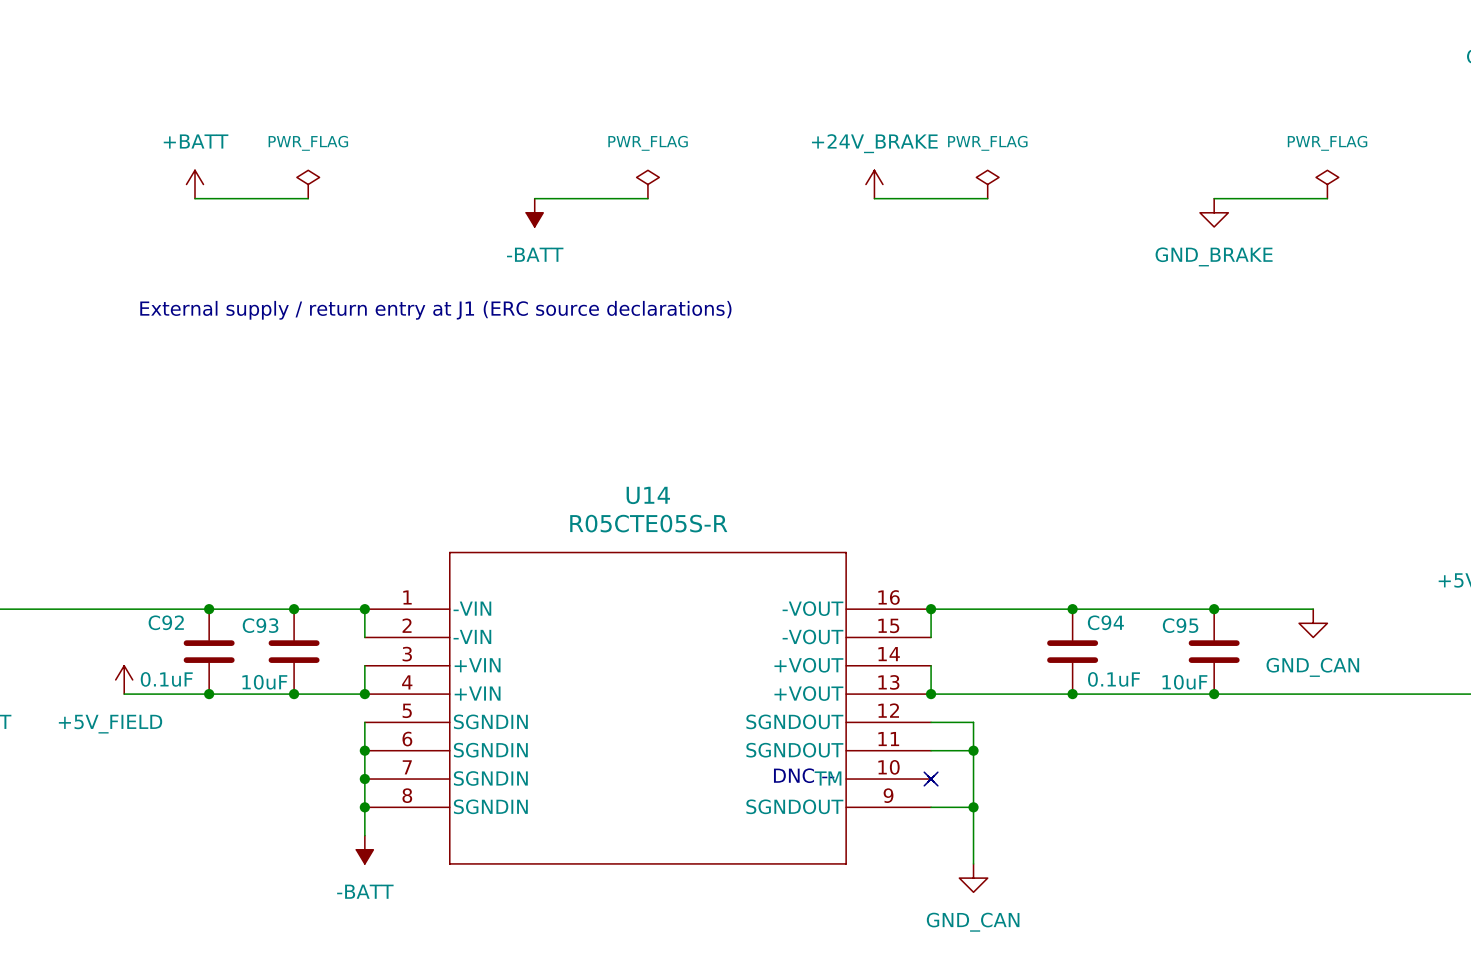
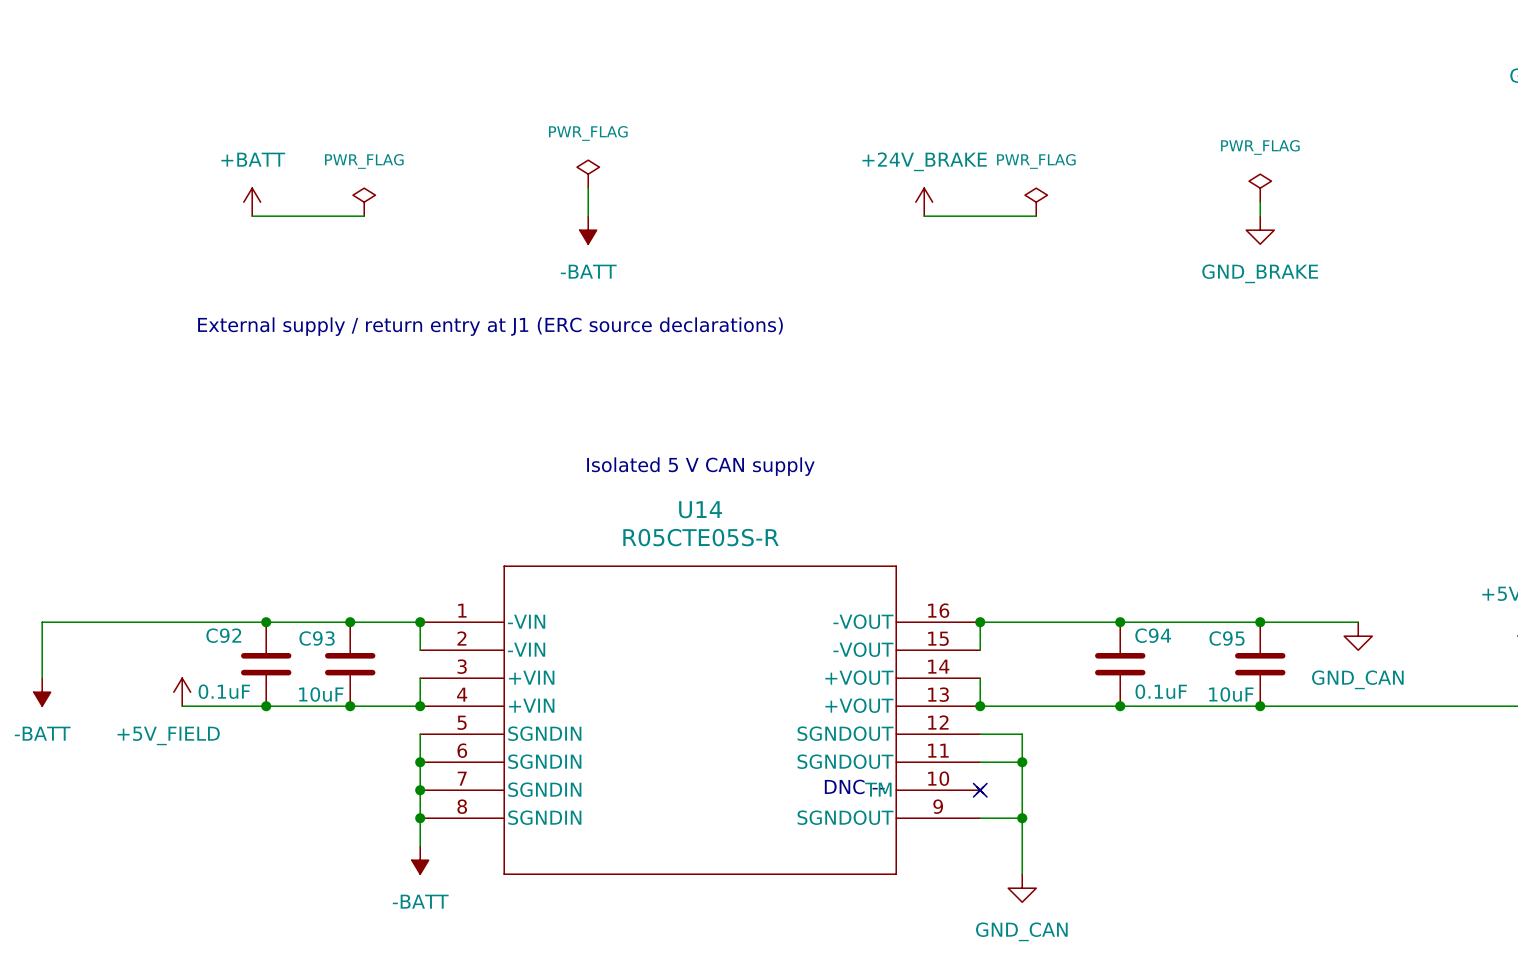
power symbol position: PWR_FLAG (647, 184) -> PWR_FLAG (588, 174)
power symbol position: PWR_FLAG (1327, 184) -> PWR_FLAG (1260, 188)
wire: (534, 198) (647, 198) -> (588, 216) (588, 188)
wire: (1214, 198) (1327, 198) -> (1260, 216) (1260, 202)
text: none -> Isolated 5 V CAN supply (700, 466)

